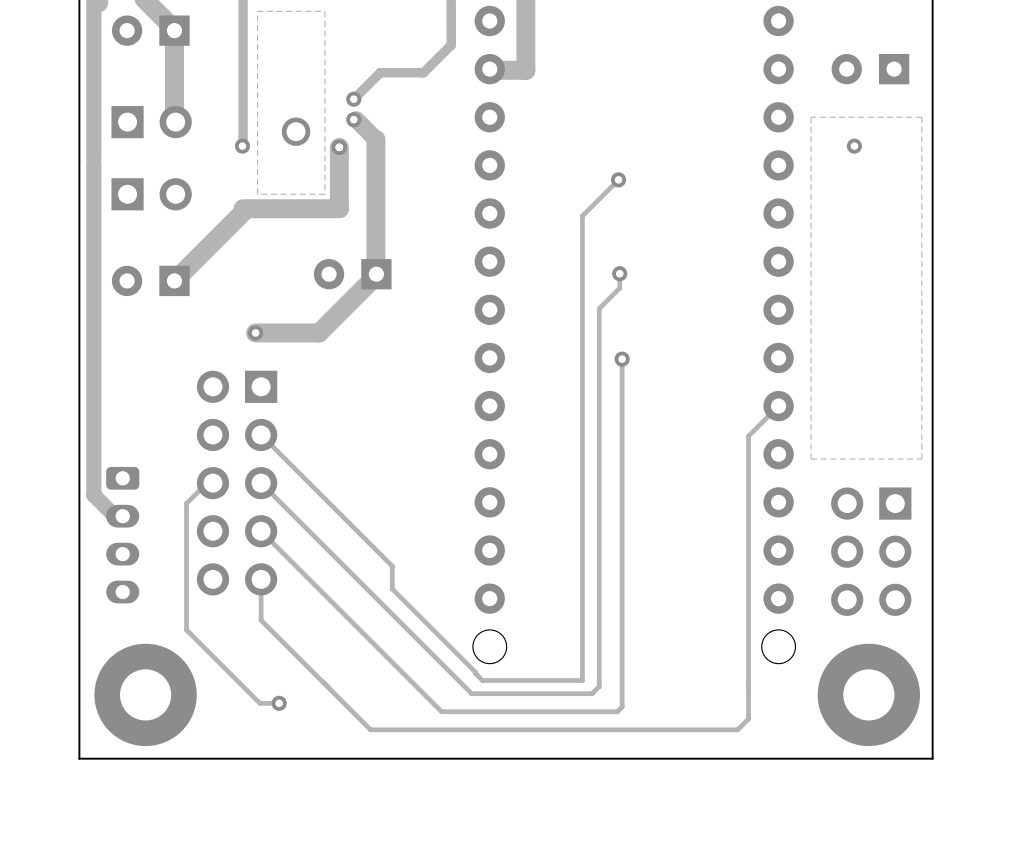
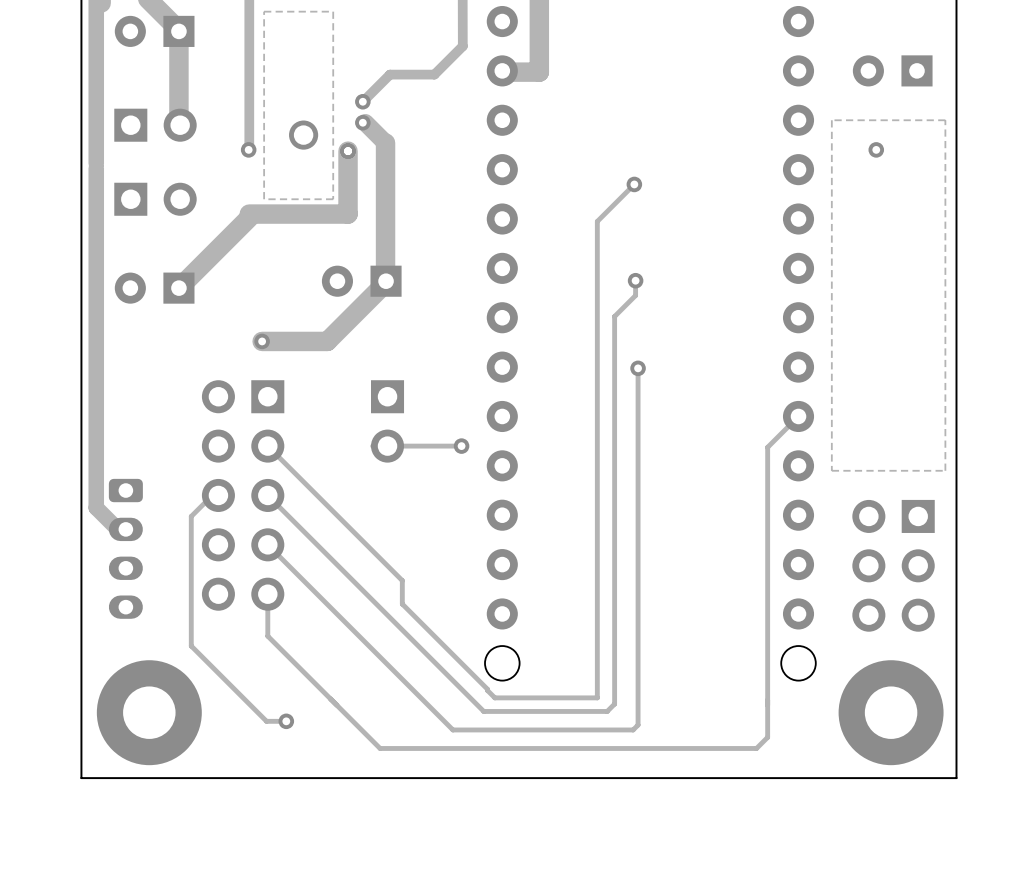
part: none -> (387, 421)
track: none -> (461, 446) (372, 446)
via: none -> (461, 446)

